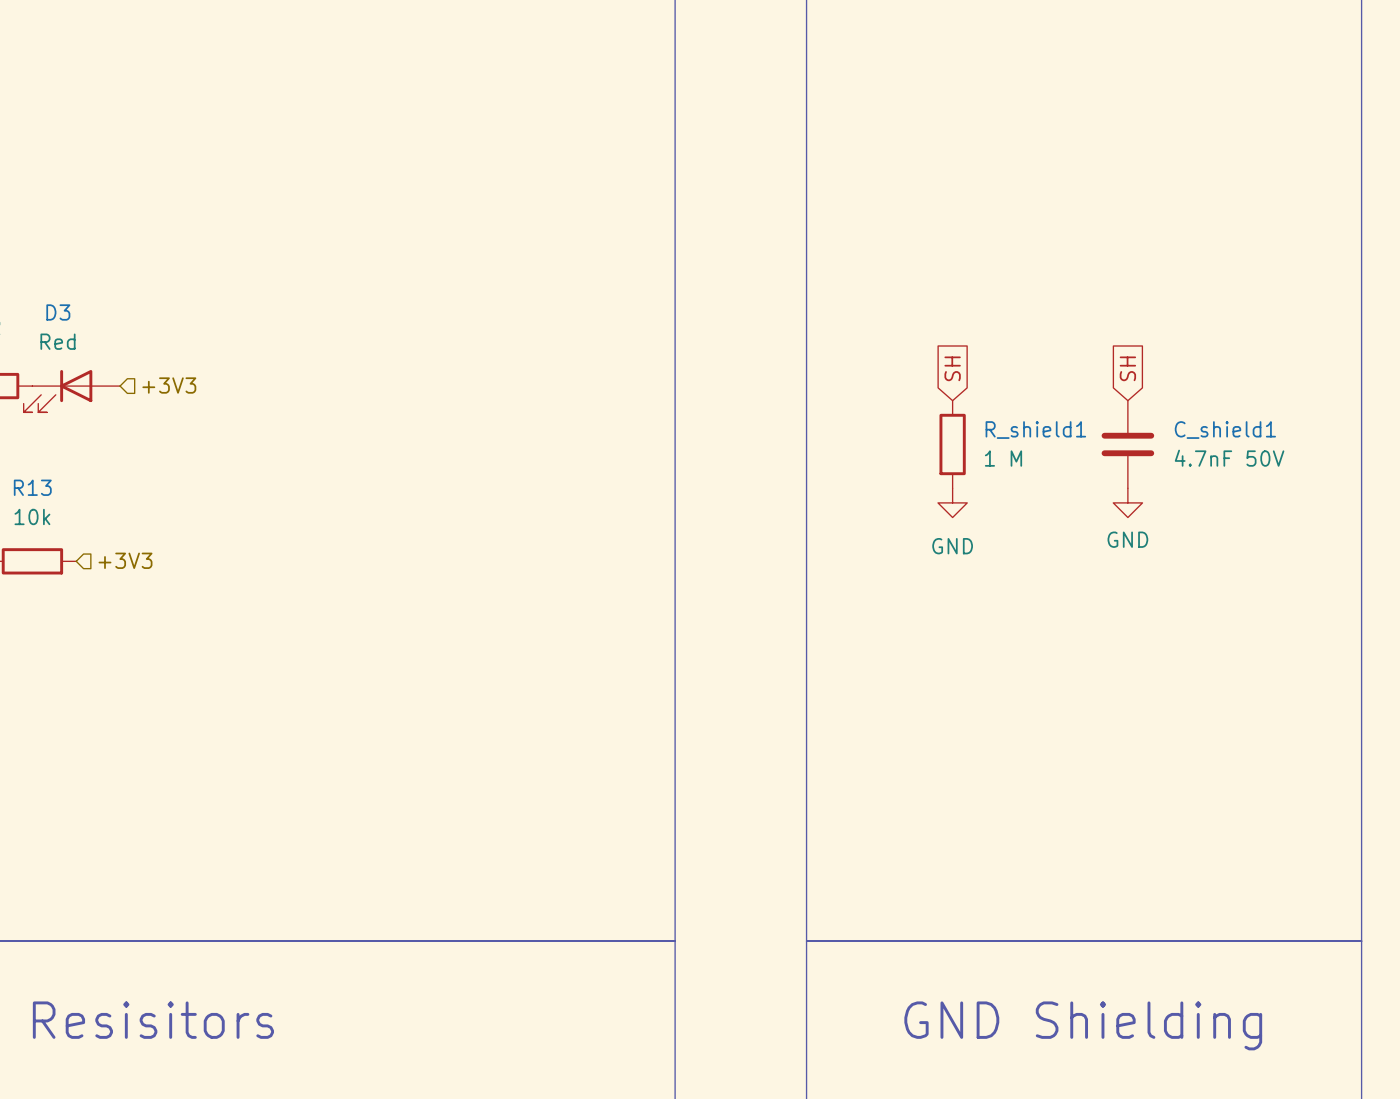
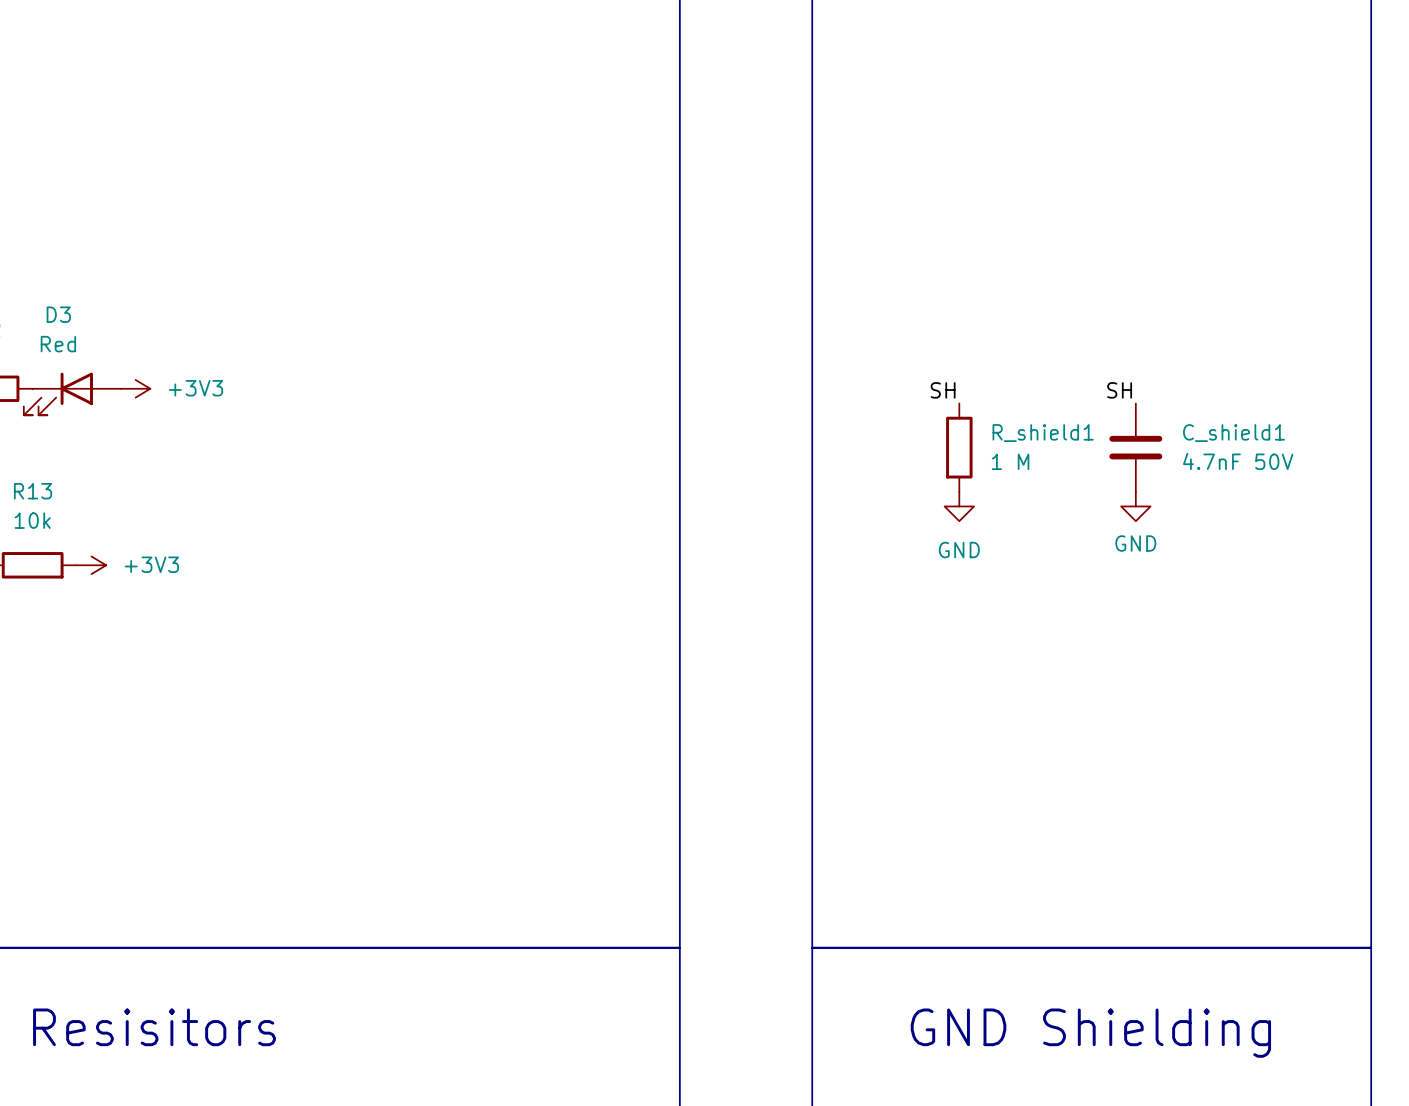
global label: SH (952, 368) -> none
global label: SH (1127, 368) -> none
hierarchical label: +3V3 (169, 385) -> none
power symbol: none -> +3V3 (135, 388)
label: none -> SH (943, 390)
label: none -> SH (1119, 390)
hierarchical label: +3V3 (125, 560) -> none
power symbol: none -> +3V3 (91, 565)

